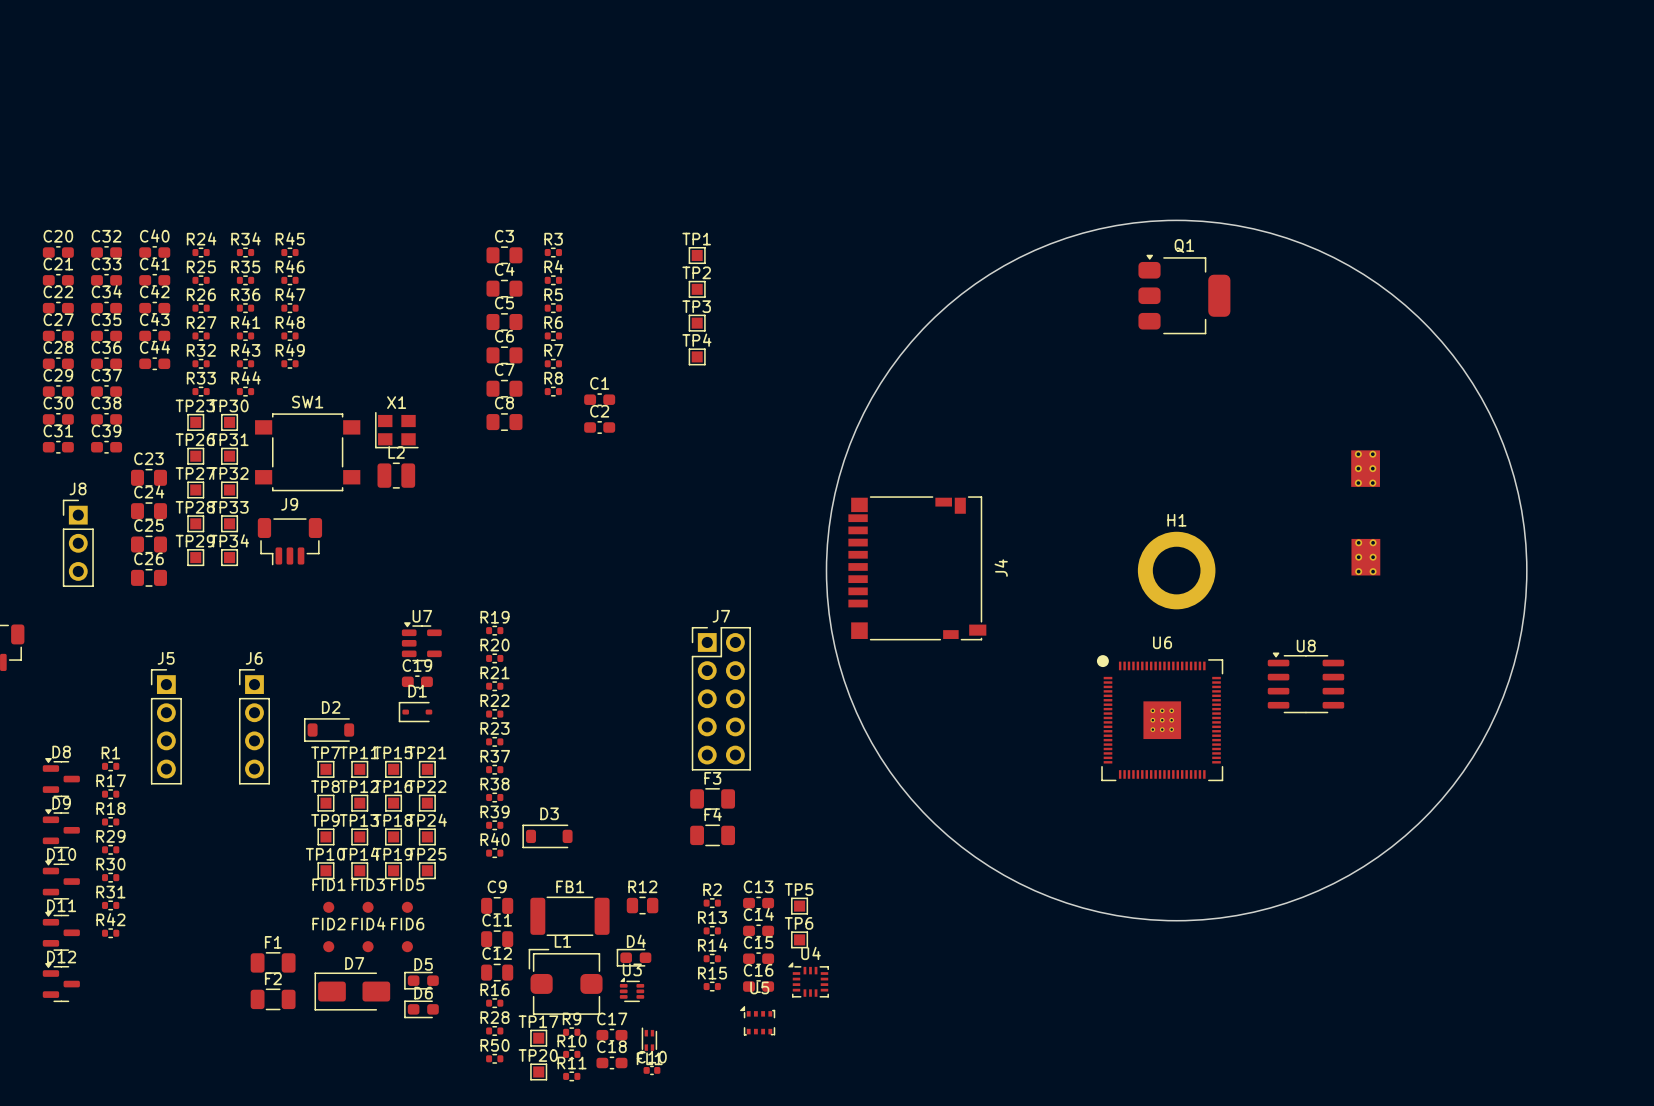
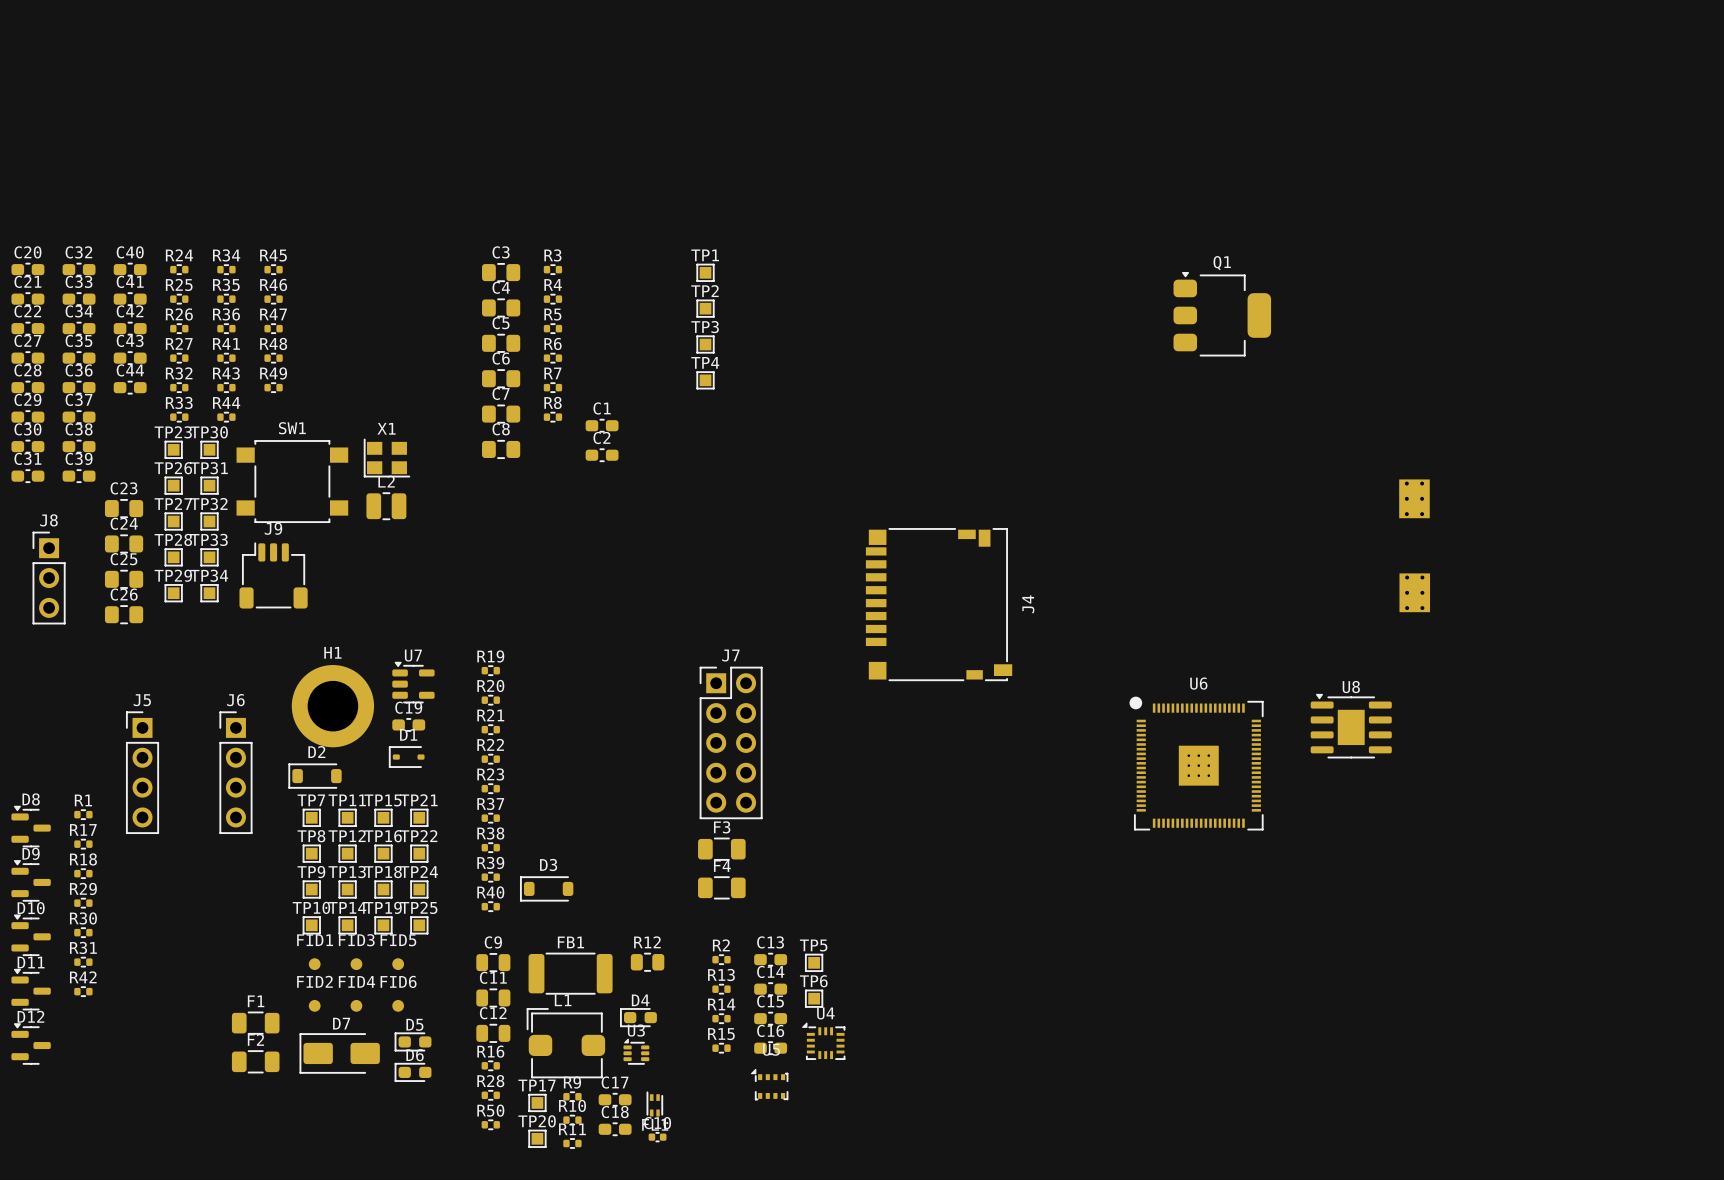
round board edge: [826, 220, 1528, 922] -> none
J9 footprint: [257, 518, 323, 566] -> [239, 542, 308, 609]
H1 position: (1176, 570) -> (332, 706)
U8 footprint: [1267, 652, 1345, 714] -> [1310, 693, 1392, 759]

